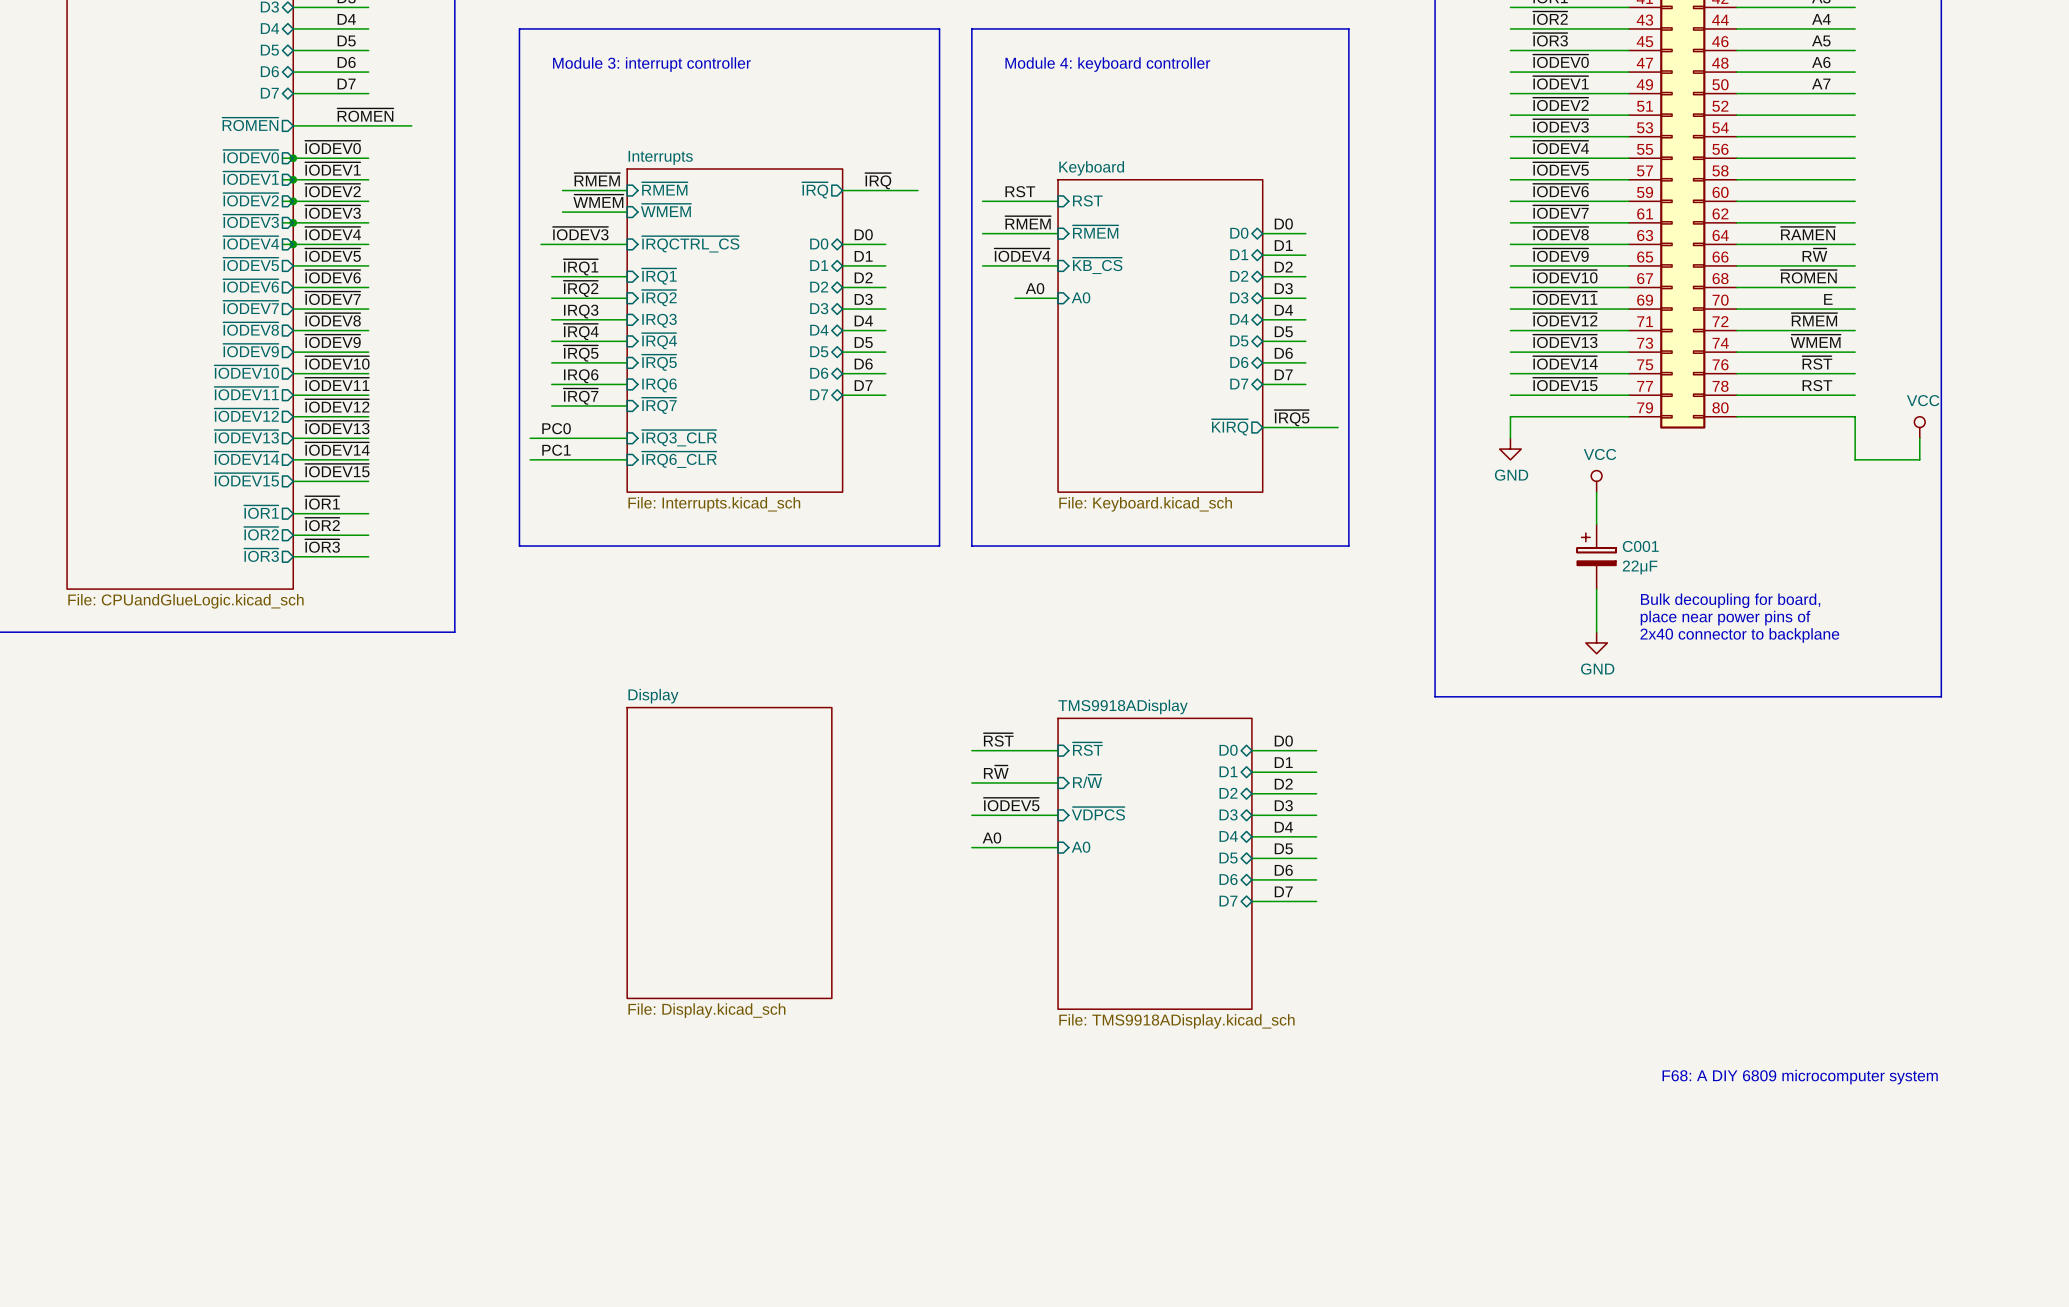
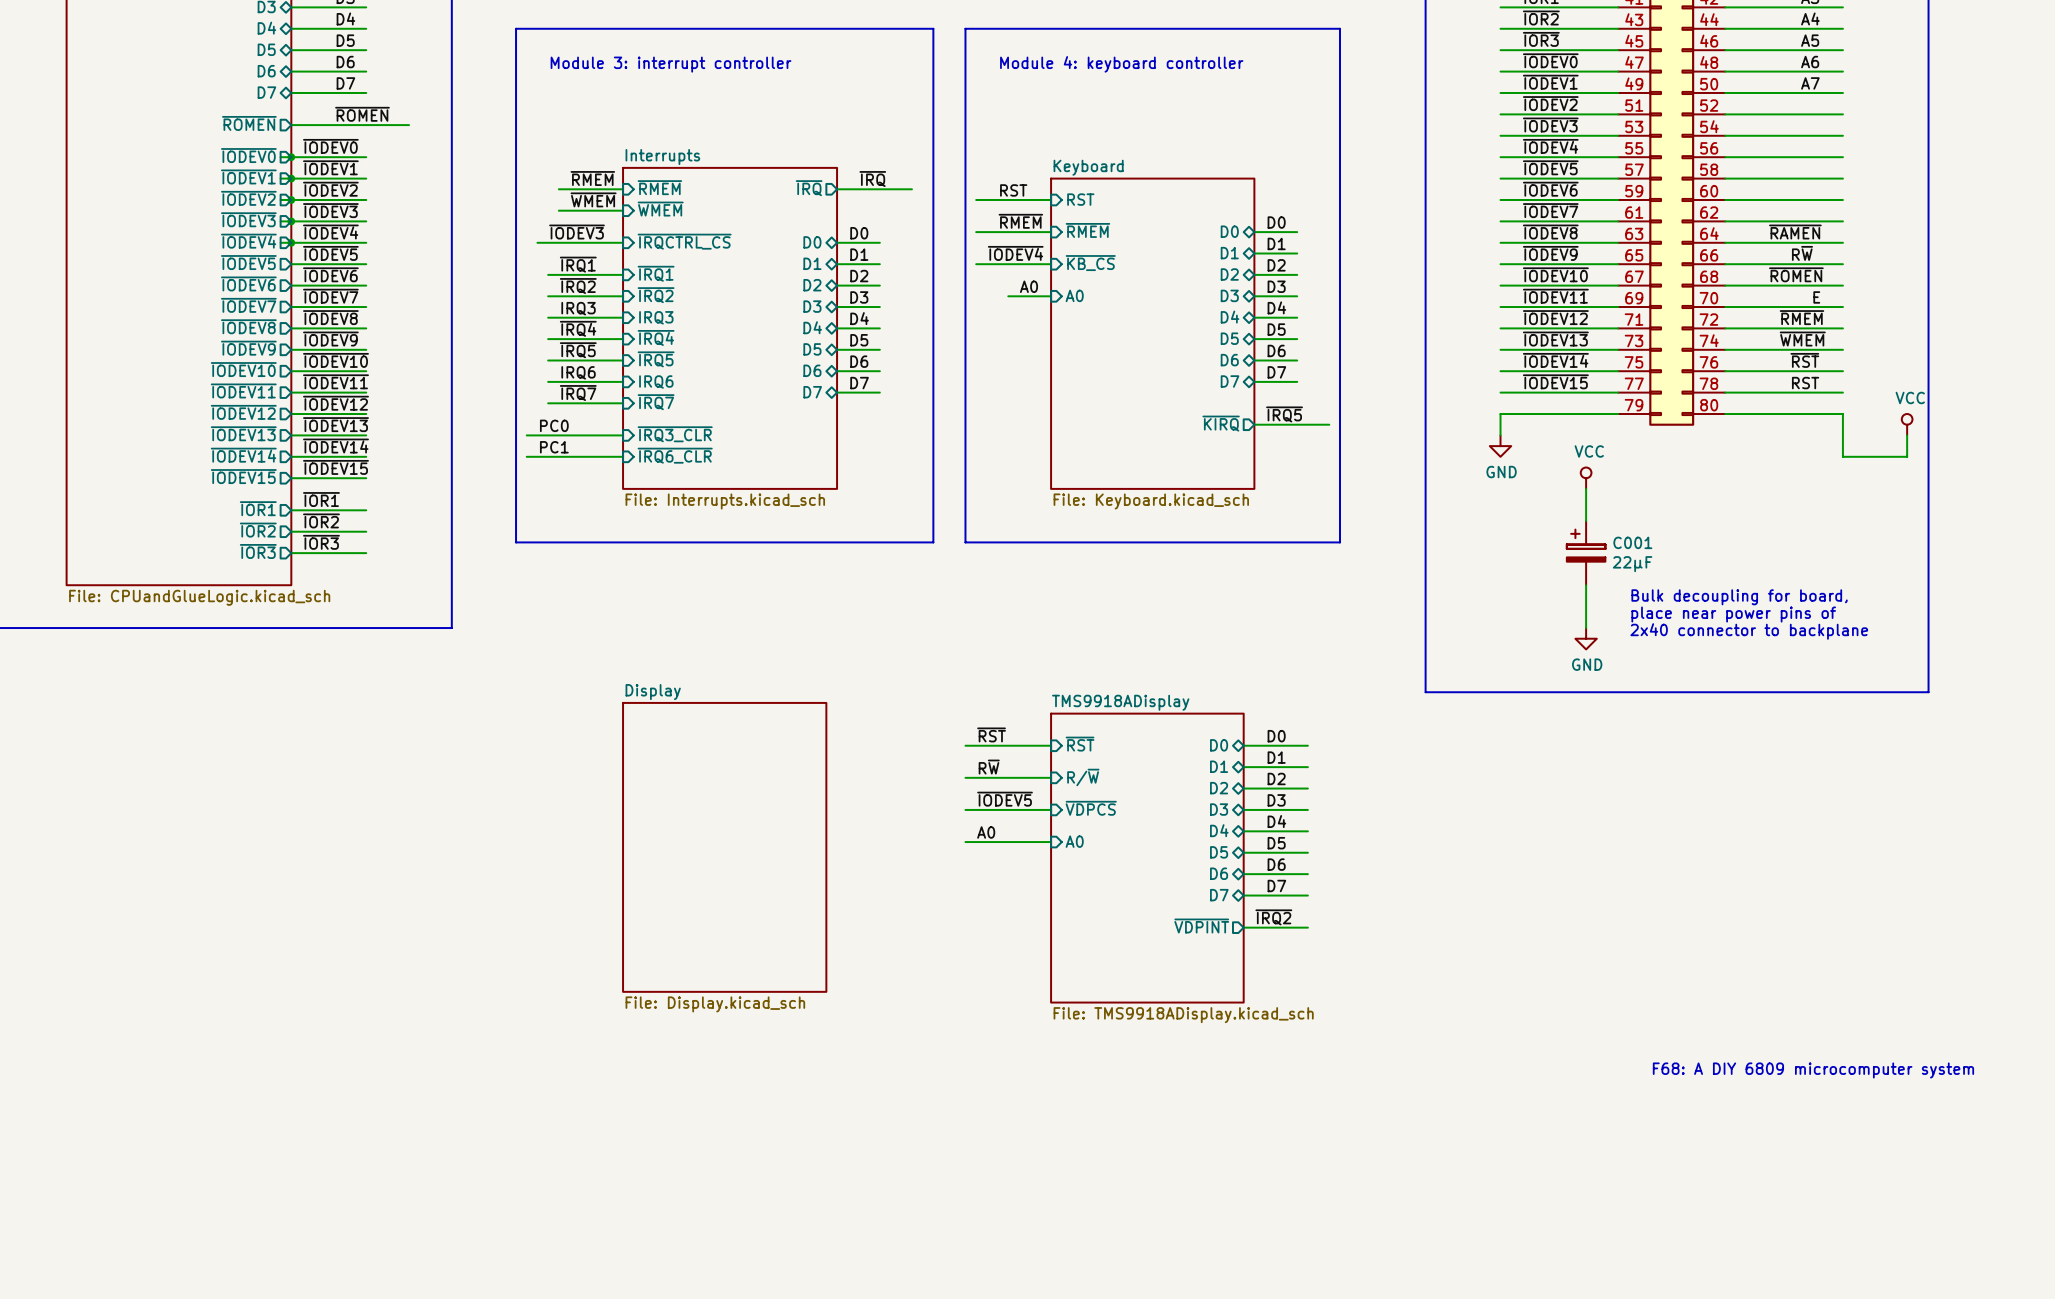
label: none -> ~{IRQ2} (1273, 917)
sheet pin: none -> ~{VDPINT} (1201, 926)
wire: none -> (1243, 927) (1307, 927)

